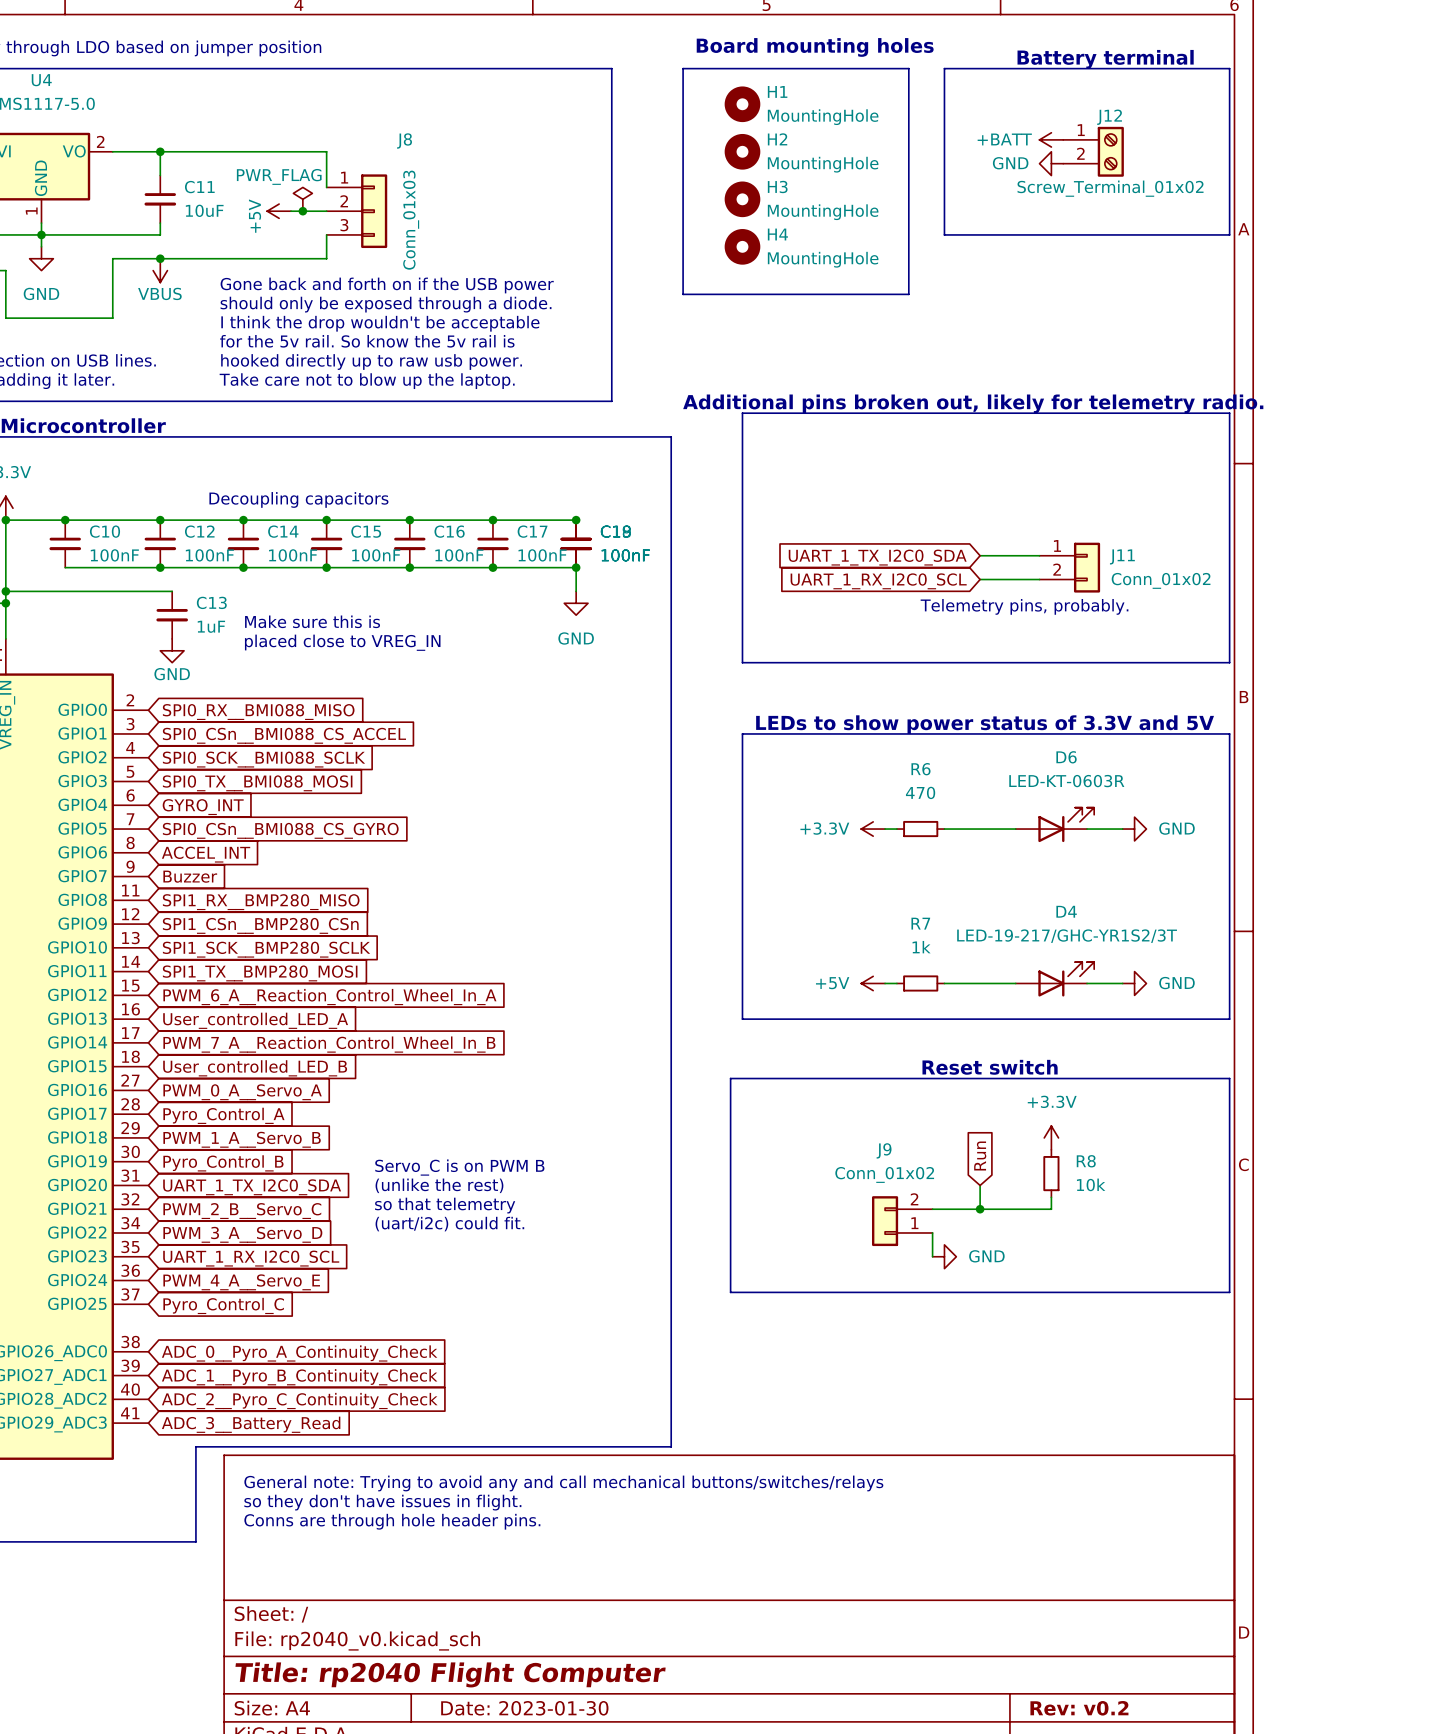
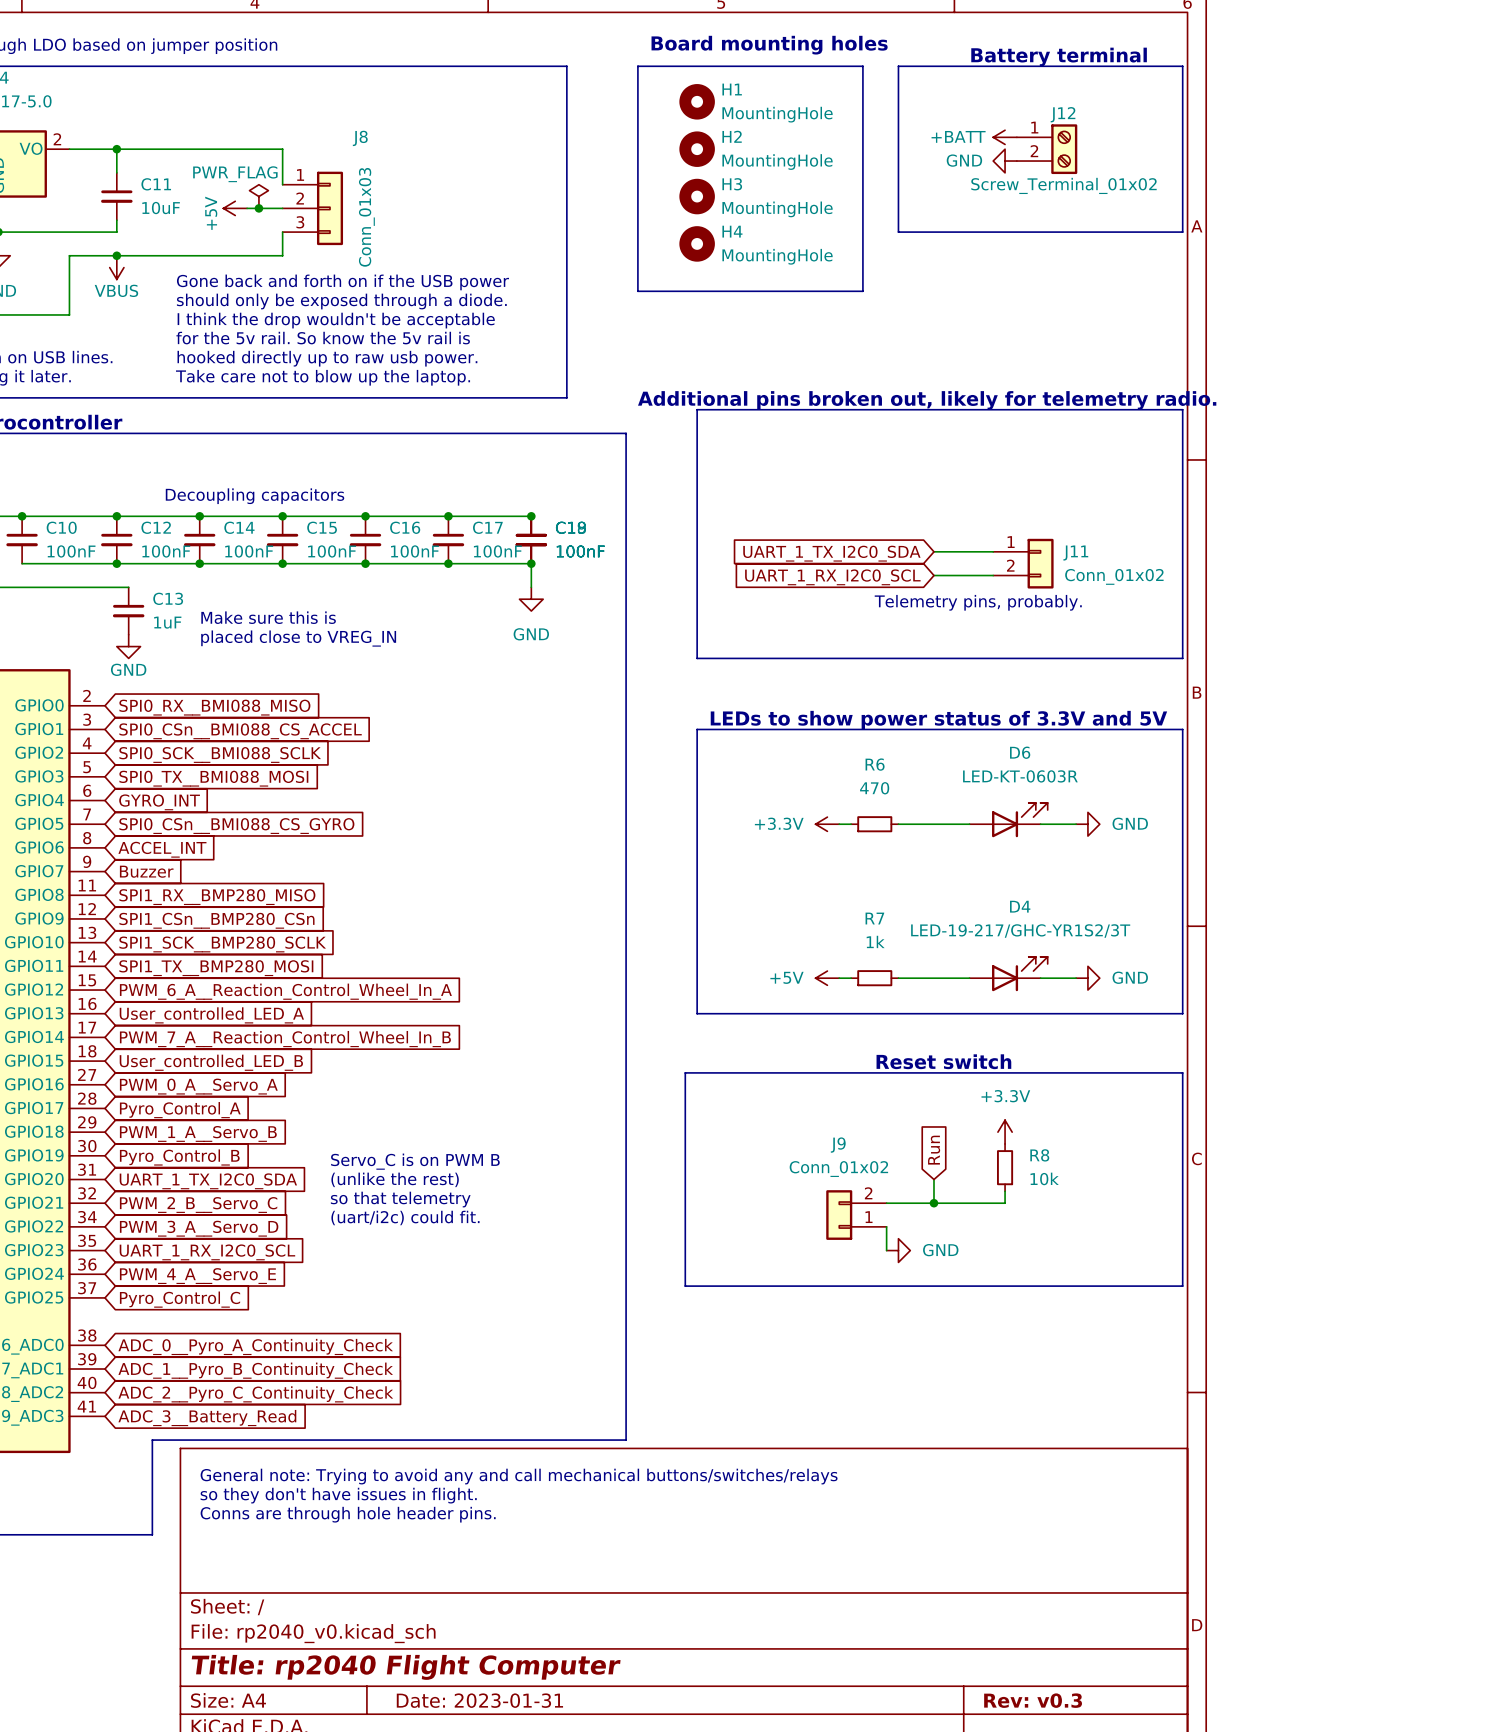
title block: Date: 2023-01-30 (524, 1708) -> Date: 2023-01-31 (479, 1700)
title block: Rev: v0.2 (1079, 1708) -> Rev: v0.3 (1033, 1700)

